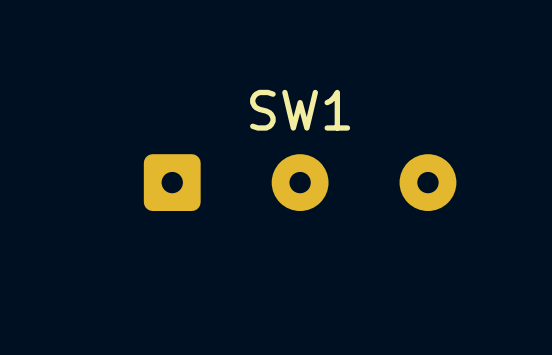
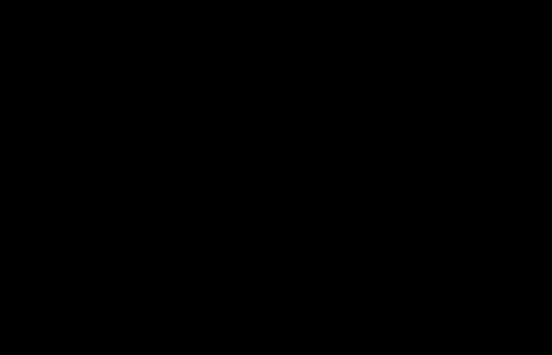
SW1: (300, 182) -> none

